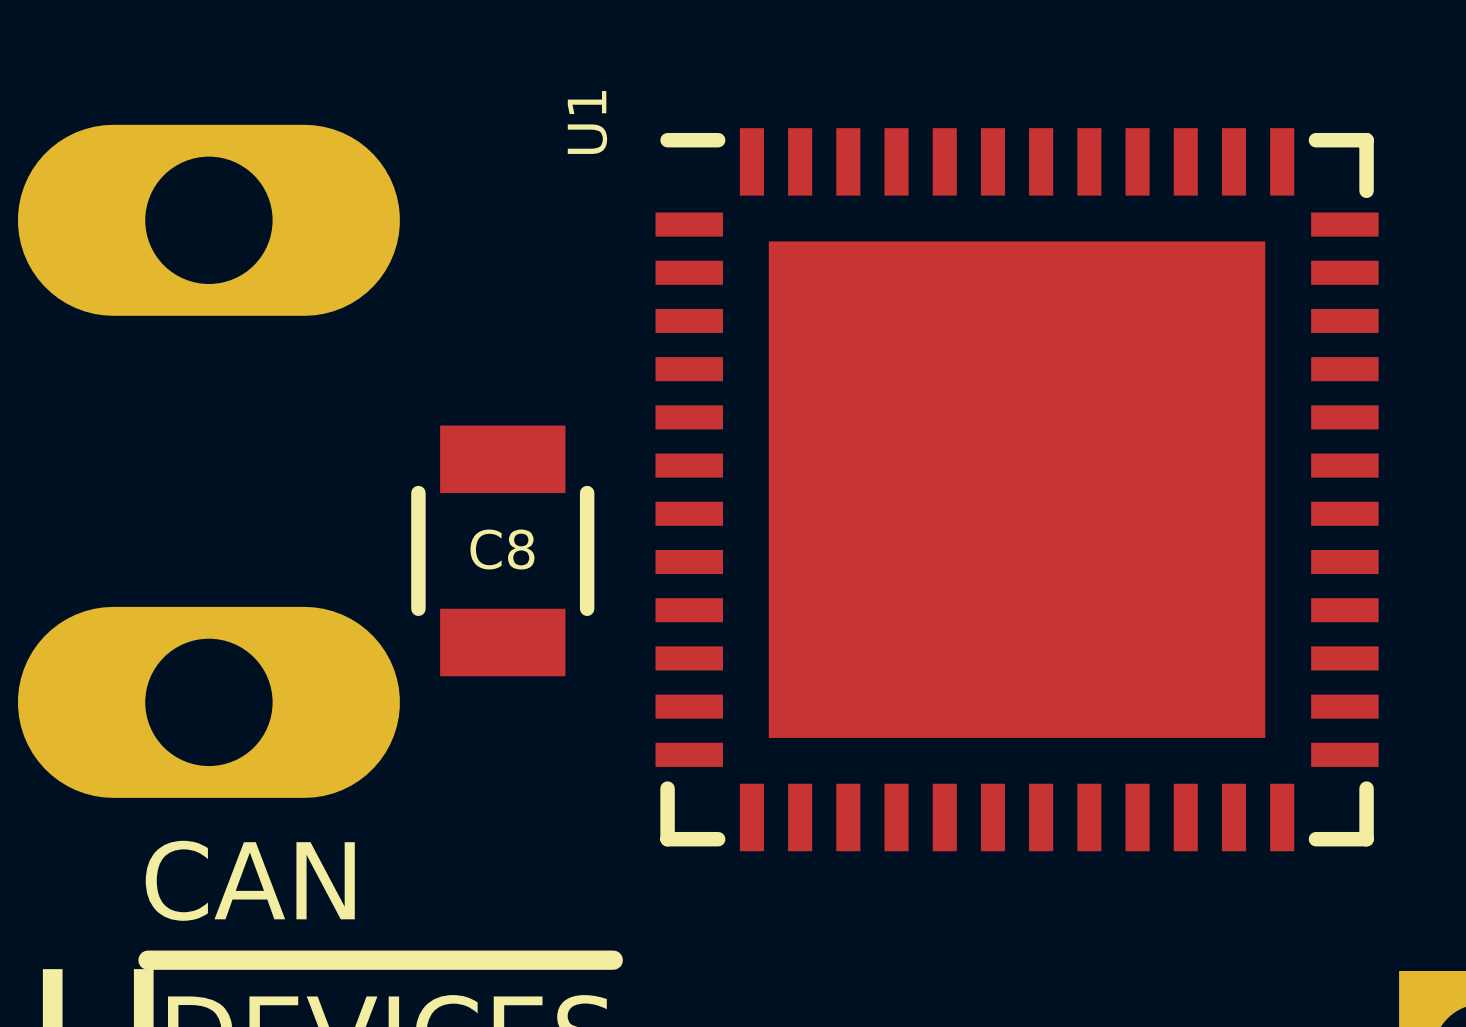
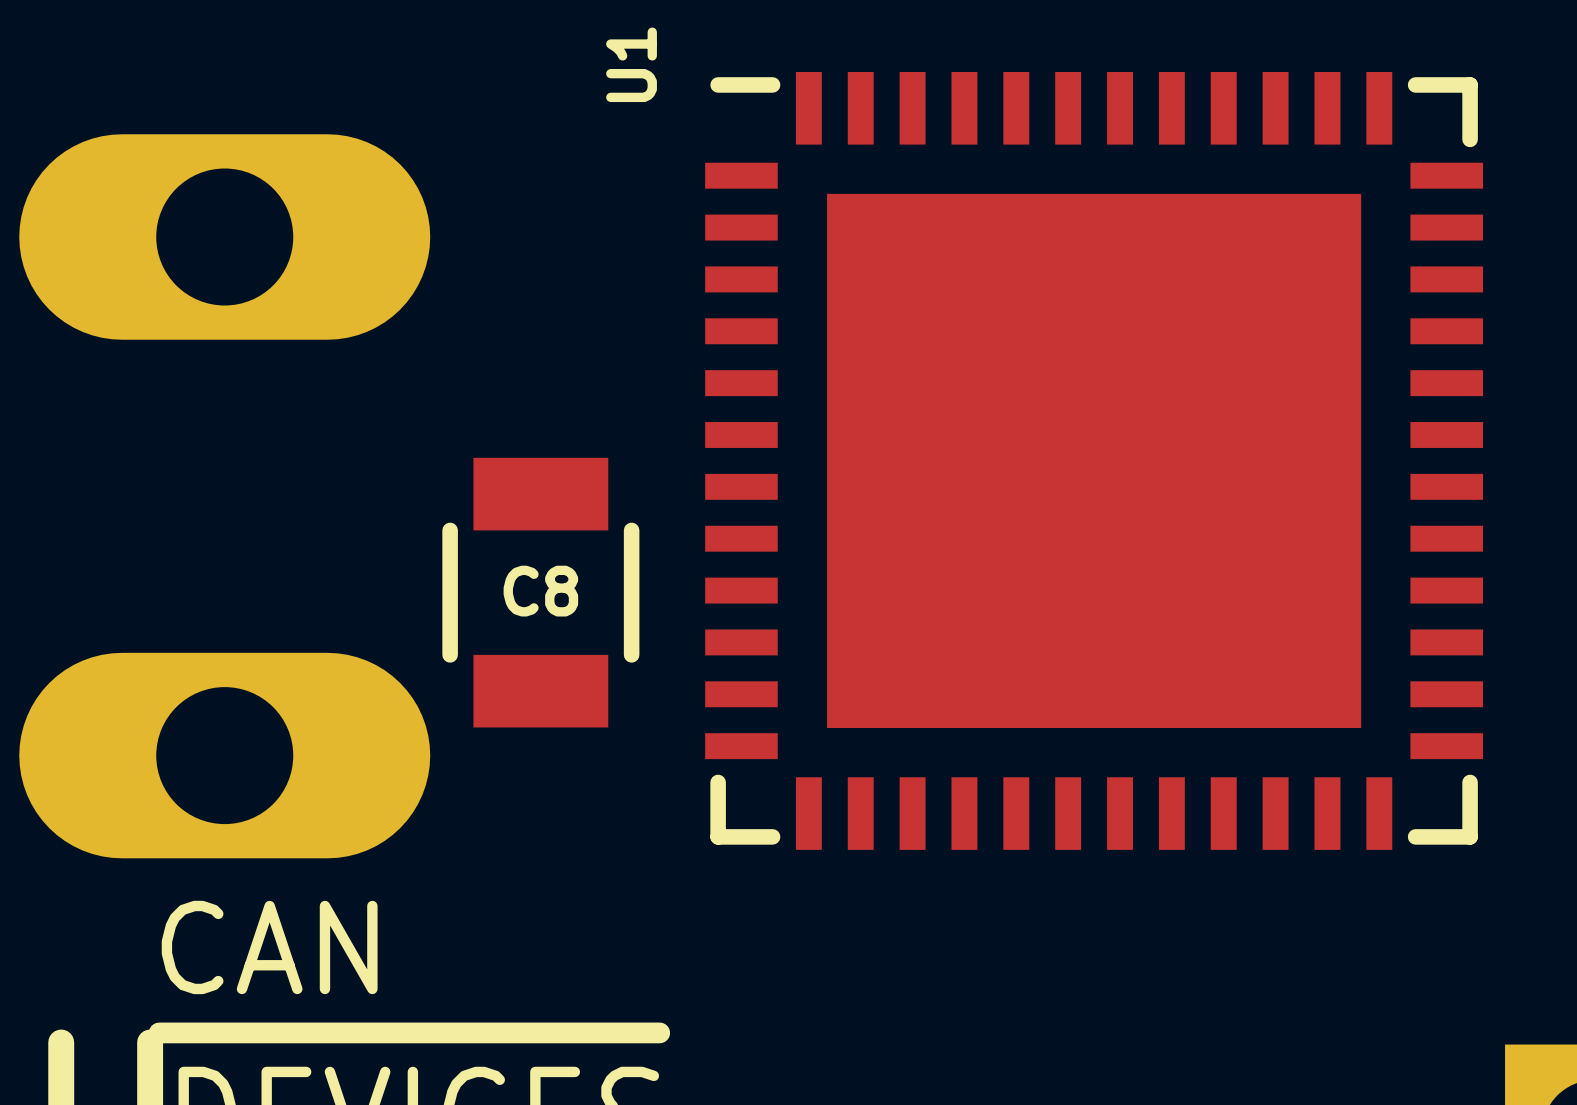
U1 position: (1017, 489) -> (1094, 460)

